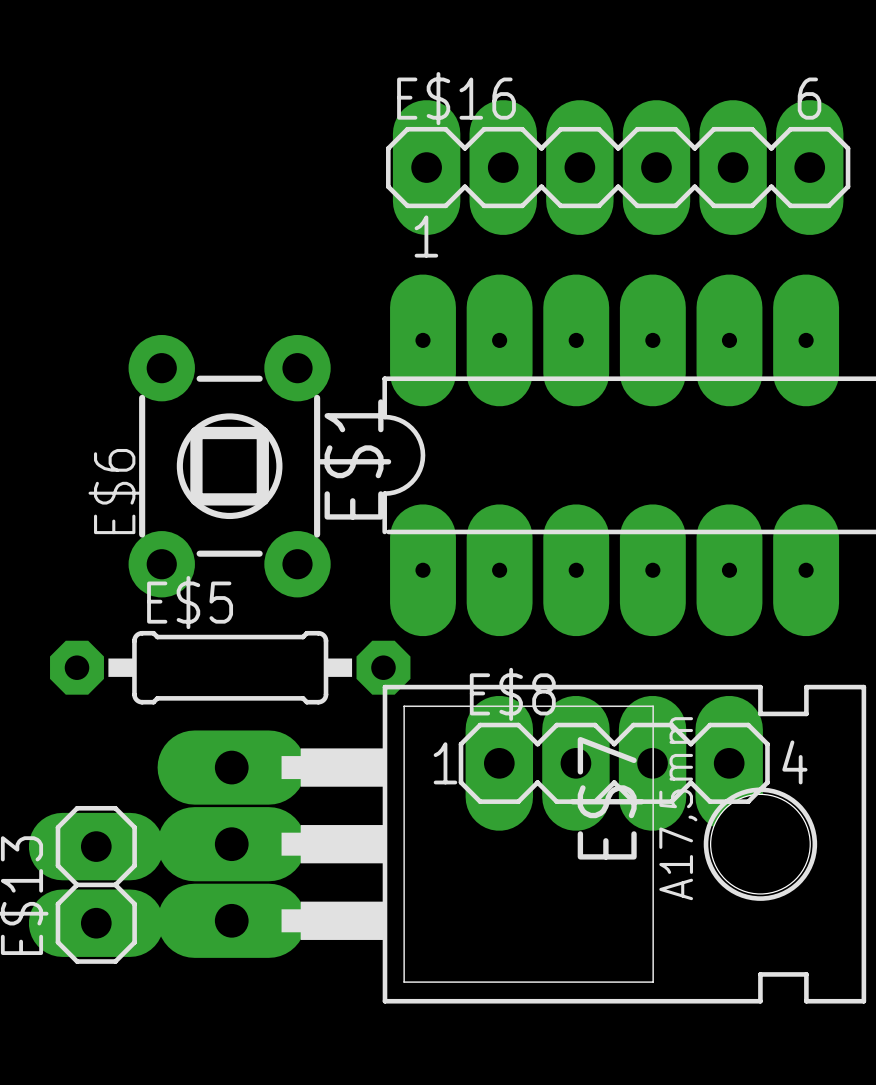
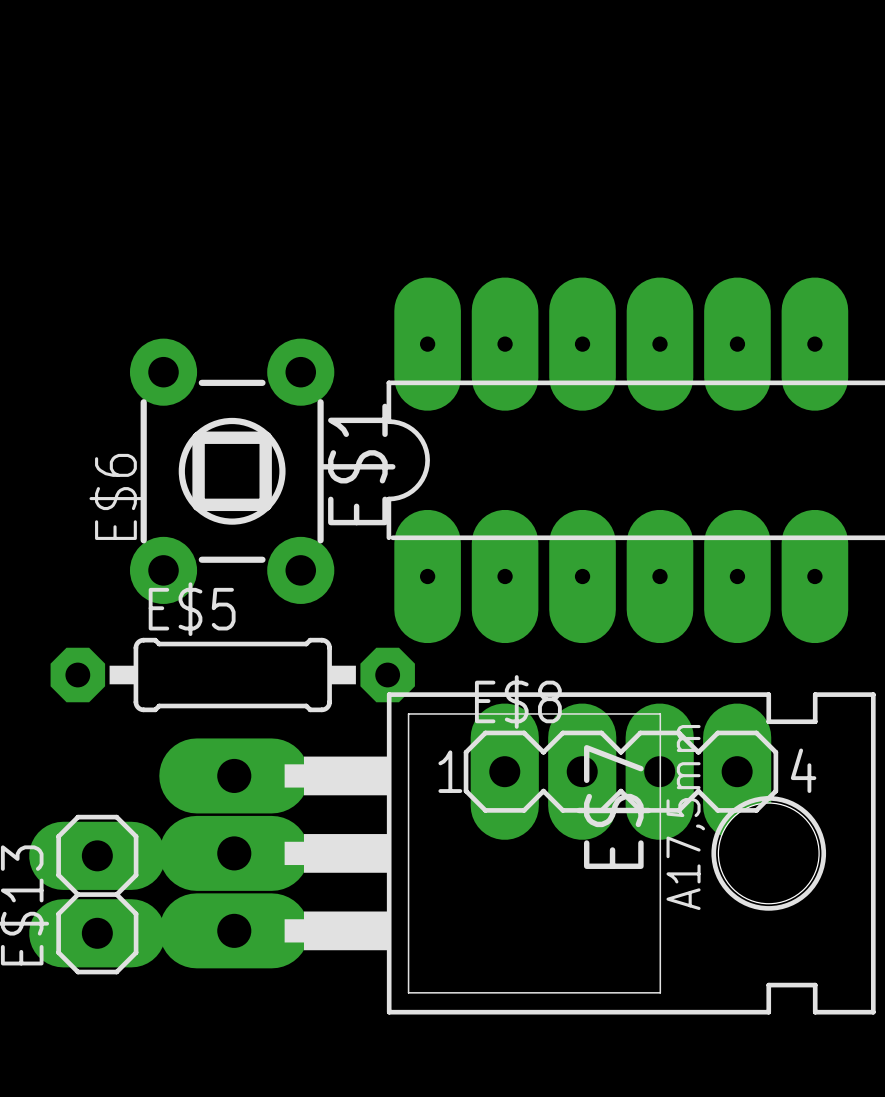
E$16: (618, 167) -> none

